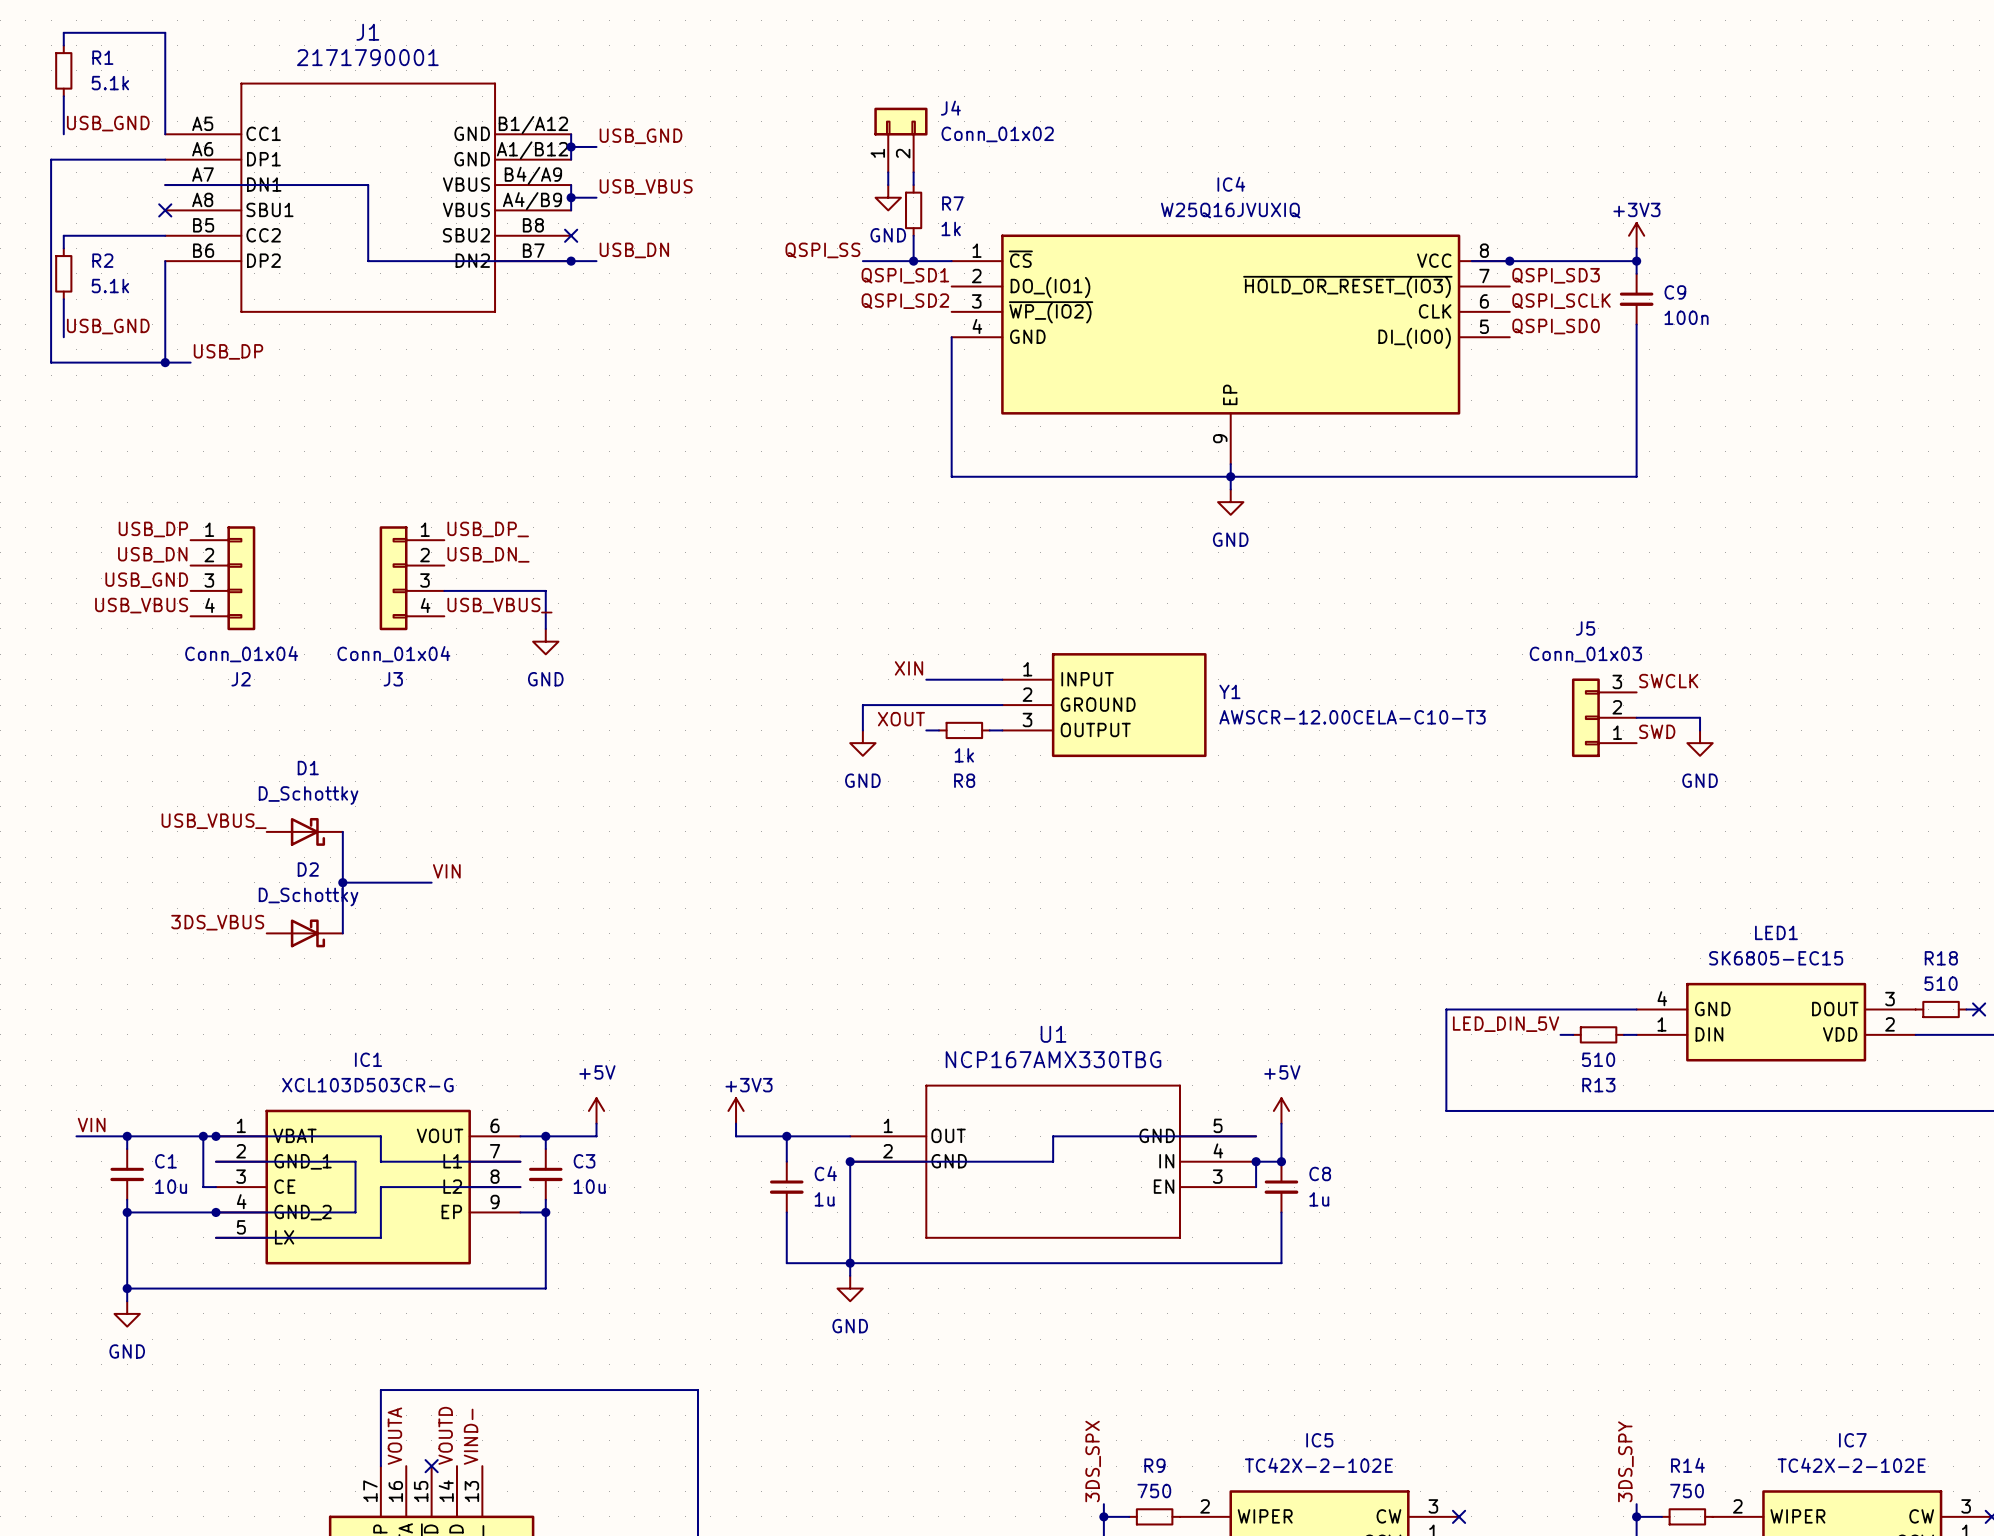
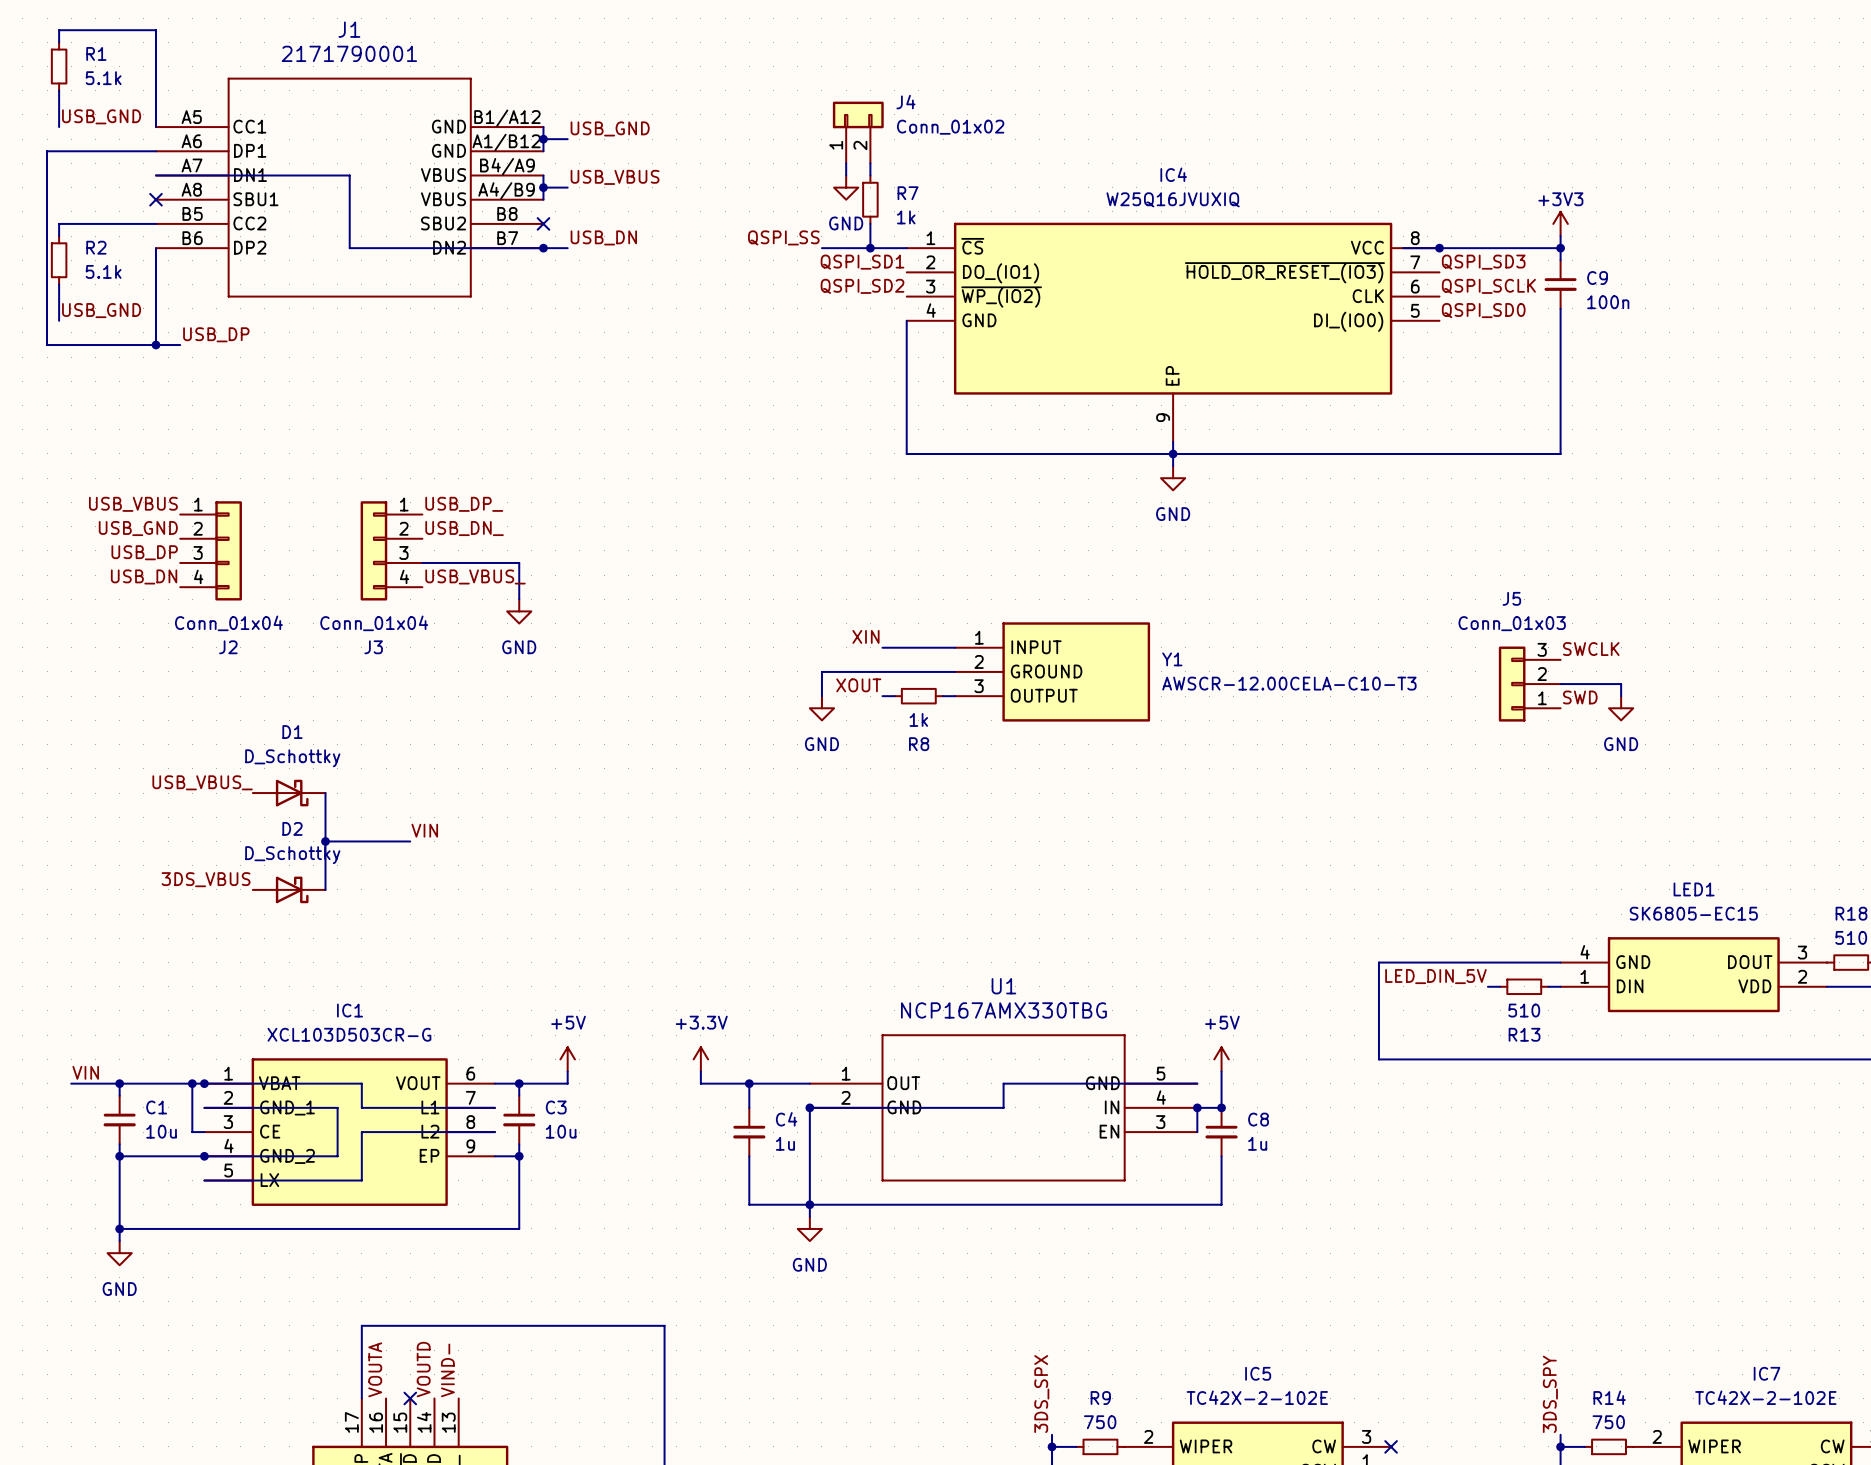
label: USB_DP (153, 529) -> USB_VBUS (133, 504)
label: USB_DN (152, 554) -> USB_GND (138, 528)
label: USB_GND (146, 580) -> USB_DP (144, 552)
label: USB_VBUS (141, 605) -> USB_DN (144, 576)
power symbol: +3V3 (736, 1110) -> +3.3V (700, 1059)

